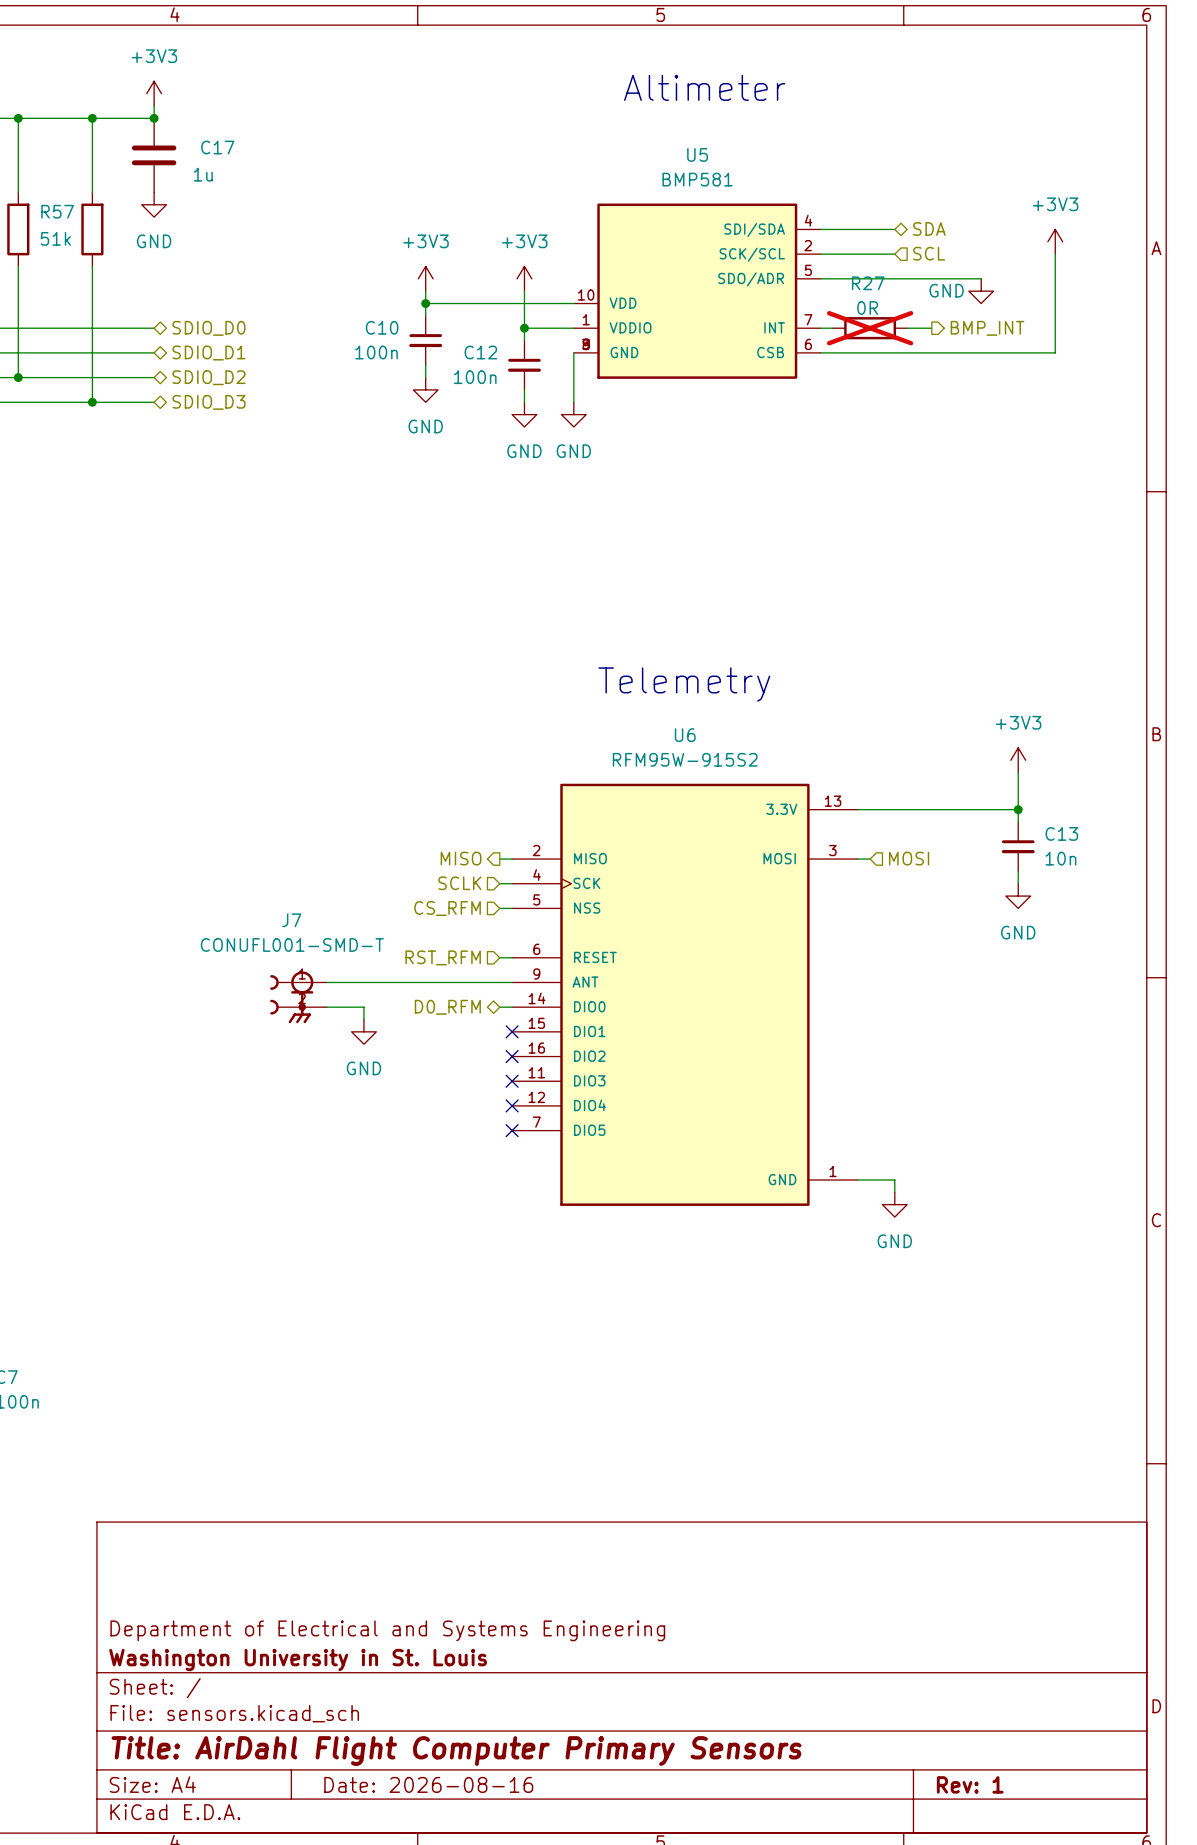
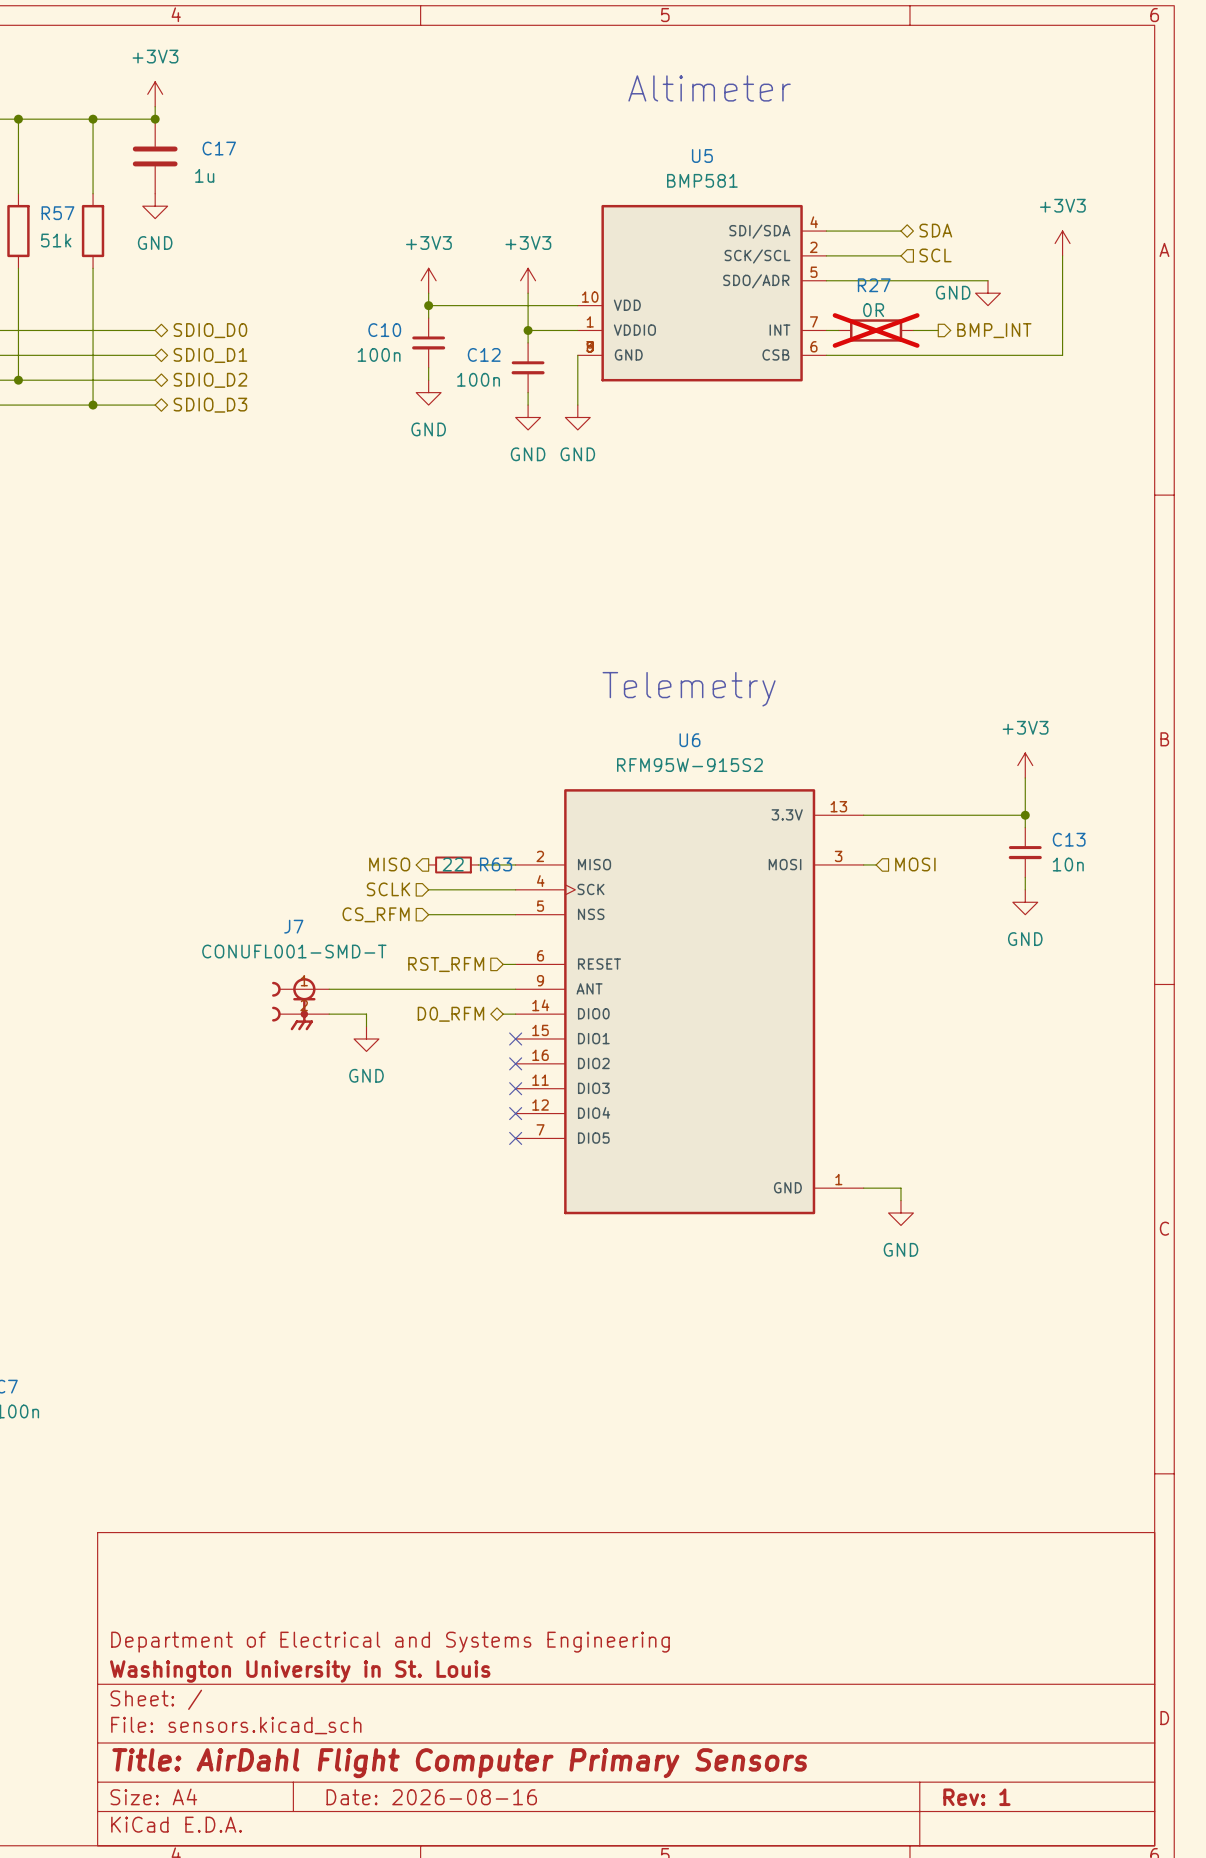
hierarchical label position: MISO (461, 858) -> MISO (389, 864)
R63: none -> 22 (453, 864)
wire: none -> (478, 864) (503, 864)
wire: none -> (428, 889) (503, 889)
hierarchical label position: SCLK (459, 883) -> SCLK (388, 889)
wire: none -> (428, 914) (503, 914)
hierarchical label position: CS_RFM (447, 908) -> CS_RFM (376, 914)

